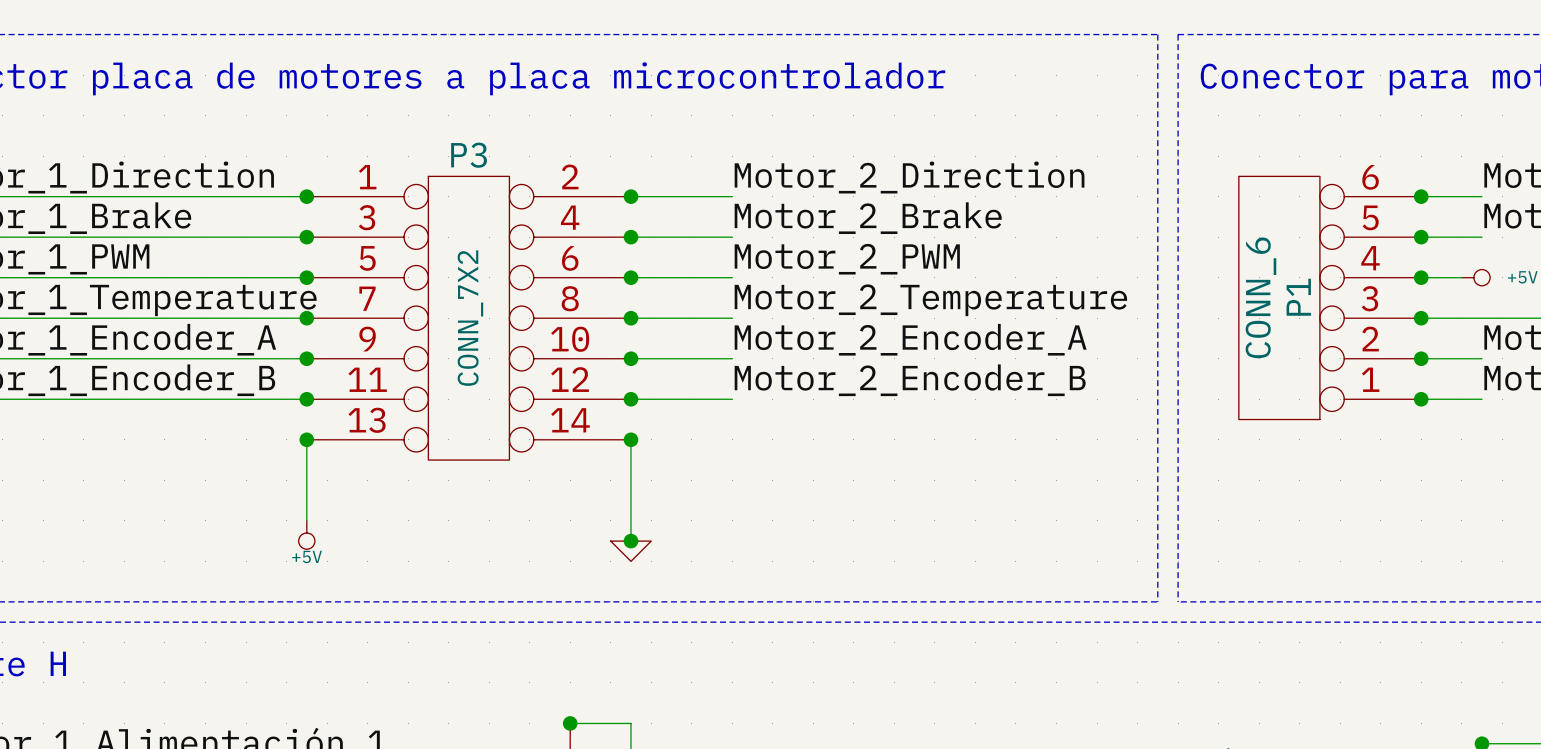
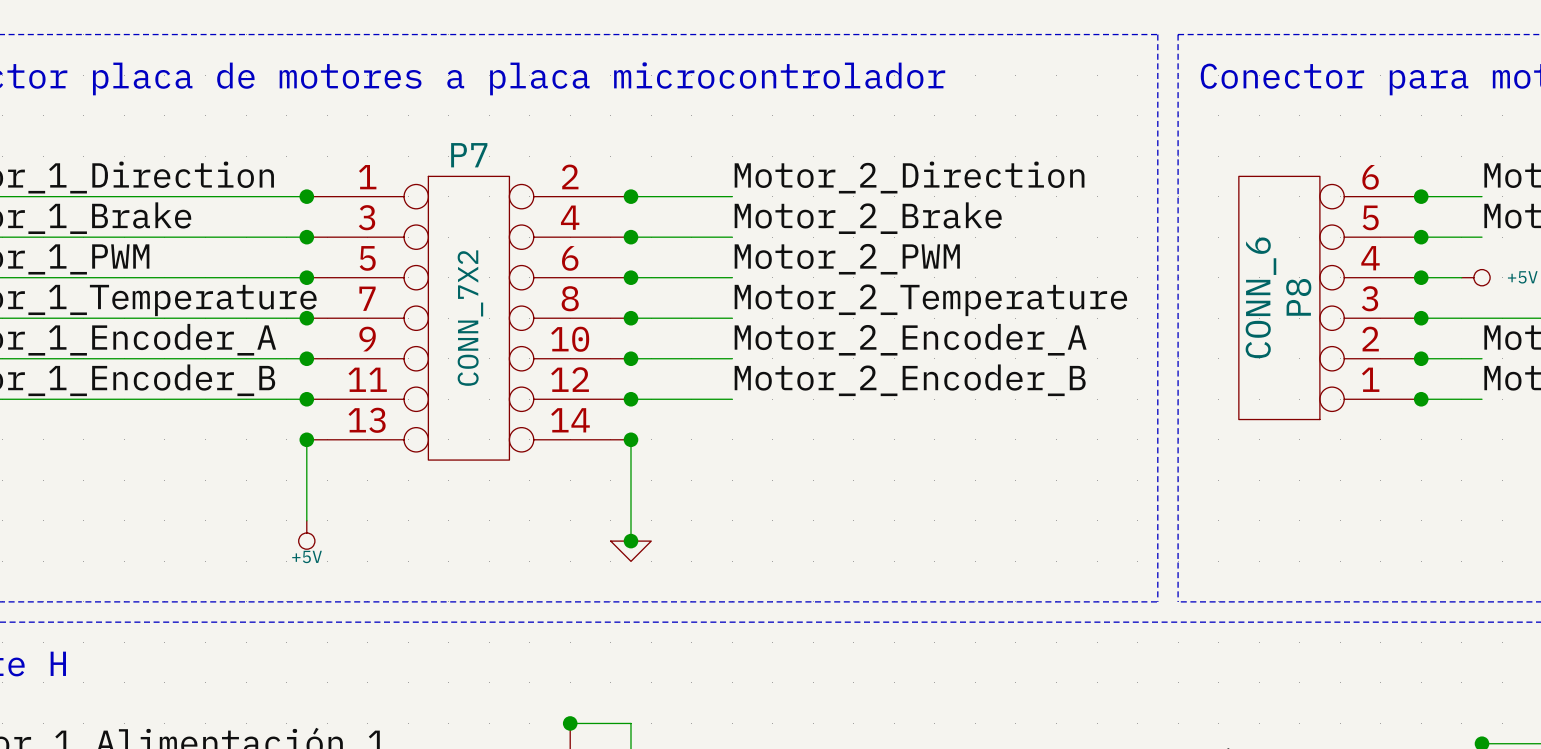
P3 name: P3 (469, 155) -> P7 (469, 155)
P1 name: P1 (1298, 297) -> P8 (1298, 297)

